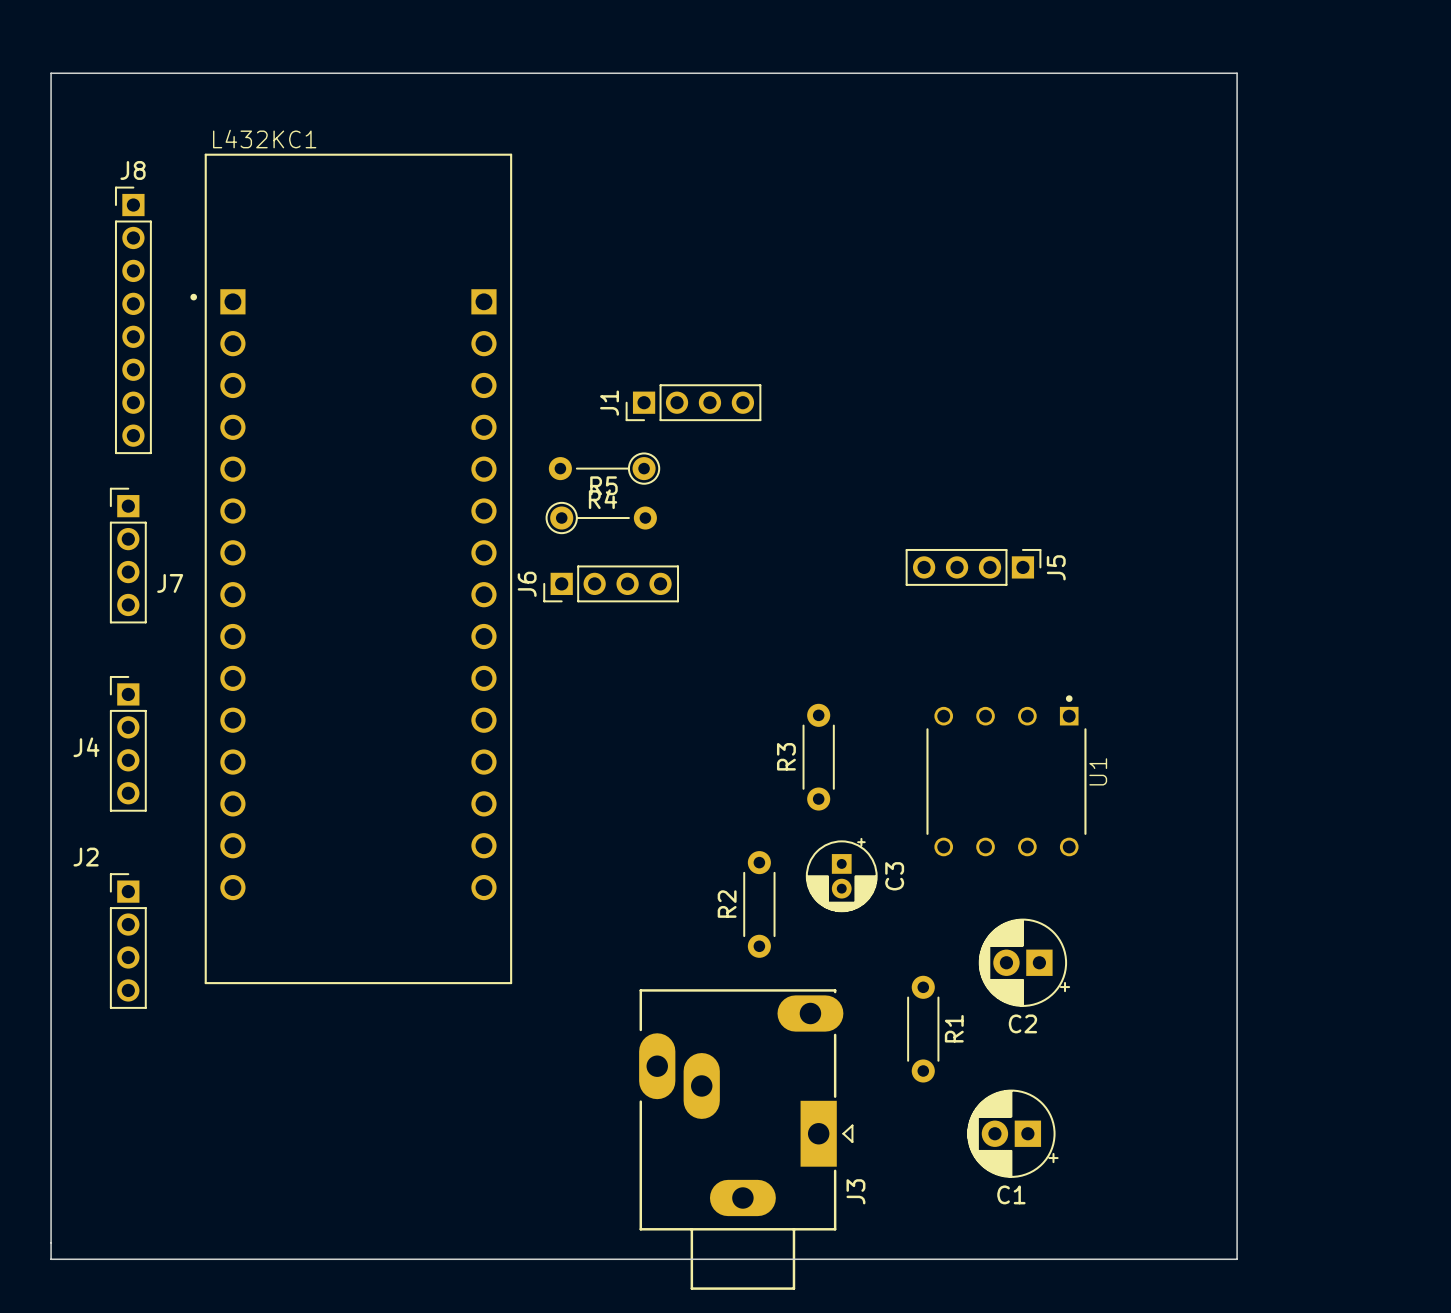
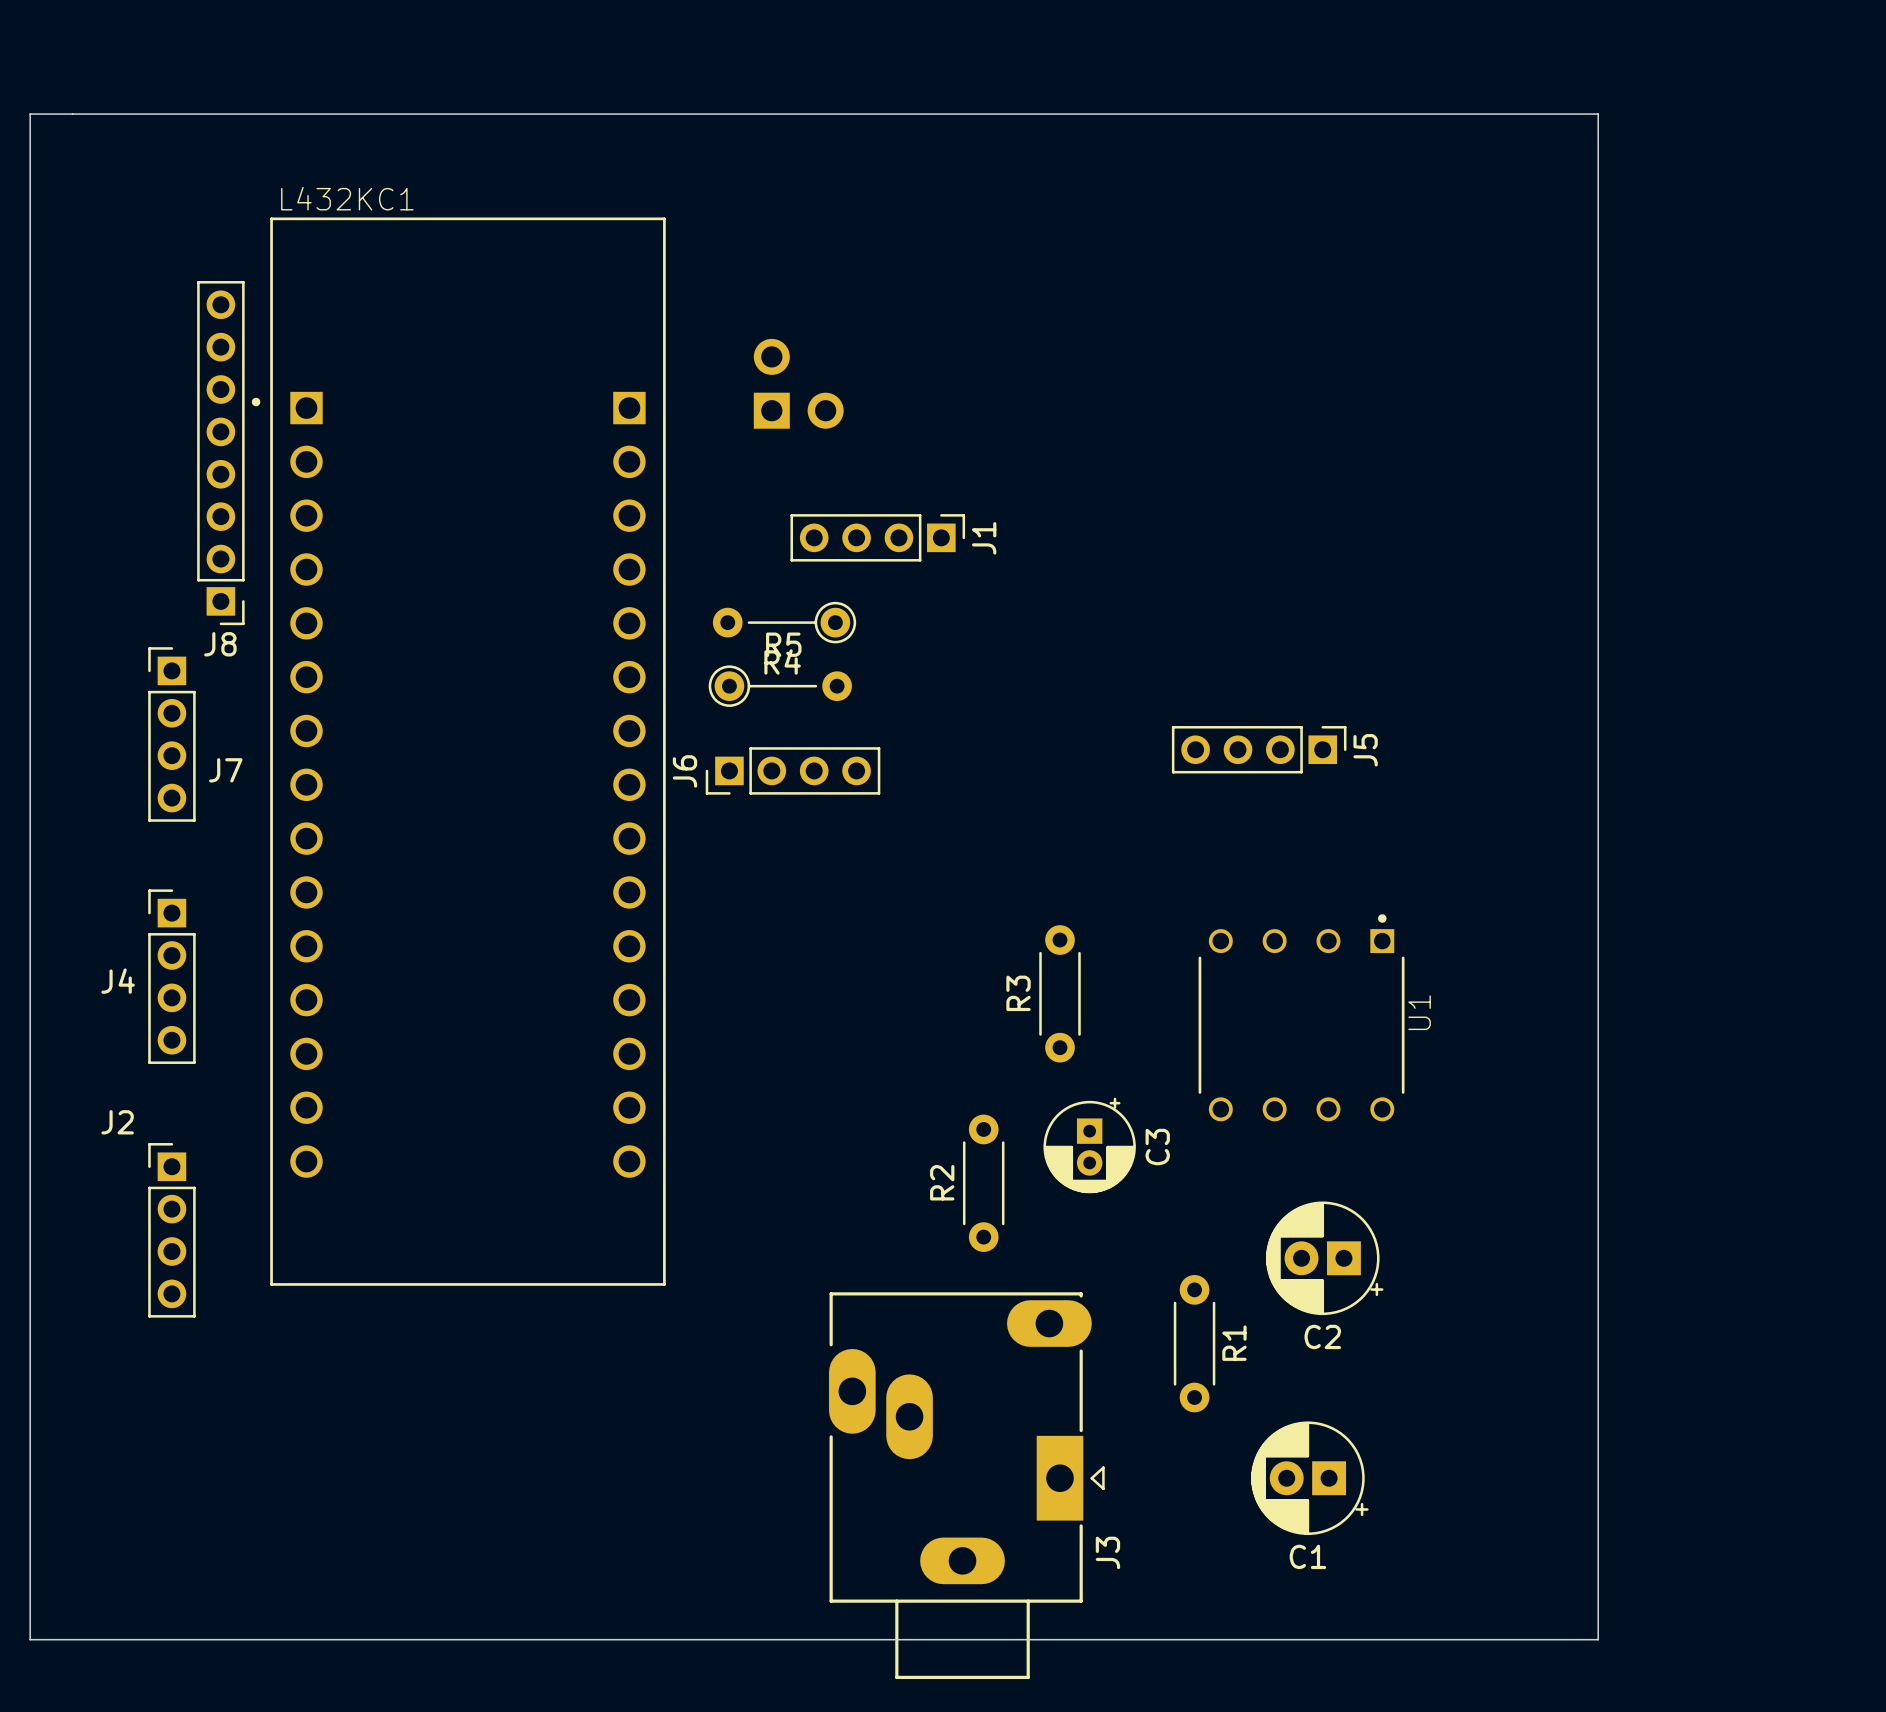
board edge: (51, 73) (51, 1259) -> (72, 114) (30, 114) (30, 1639) (72, 1639)
part: none -> (798, 383)
J8 rotation: 0° (133, 320) -> 180° (220, 453)
J1 rotation: 0° (693, 402) -> 180° (877, 537)

